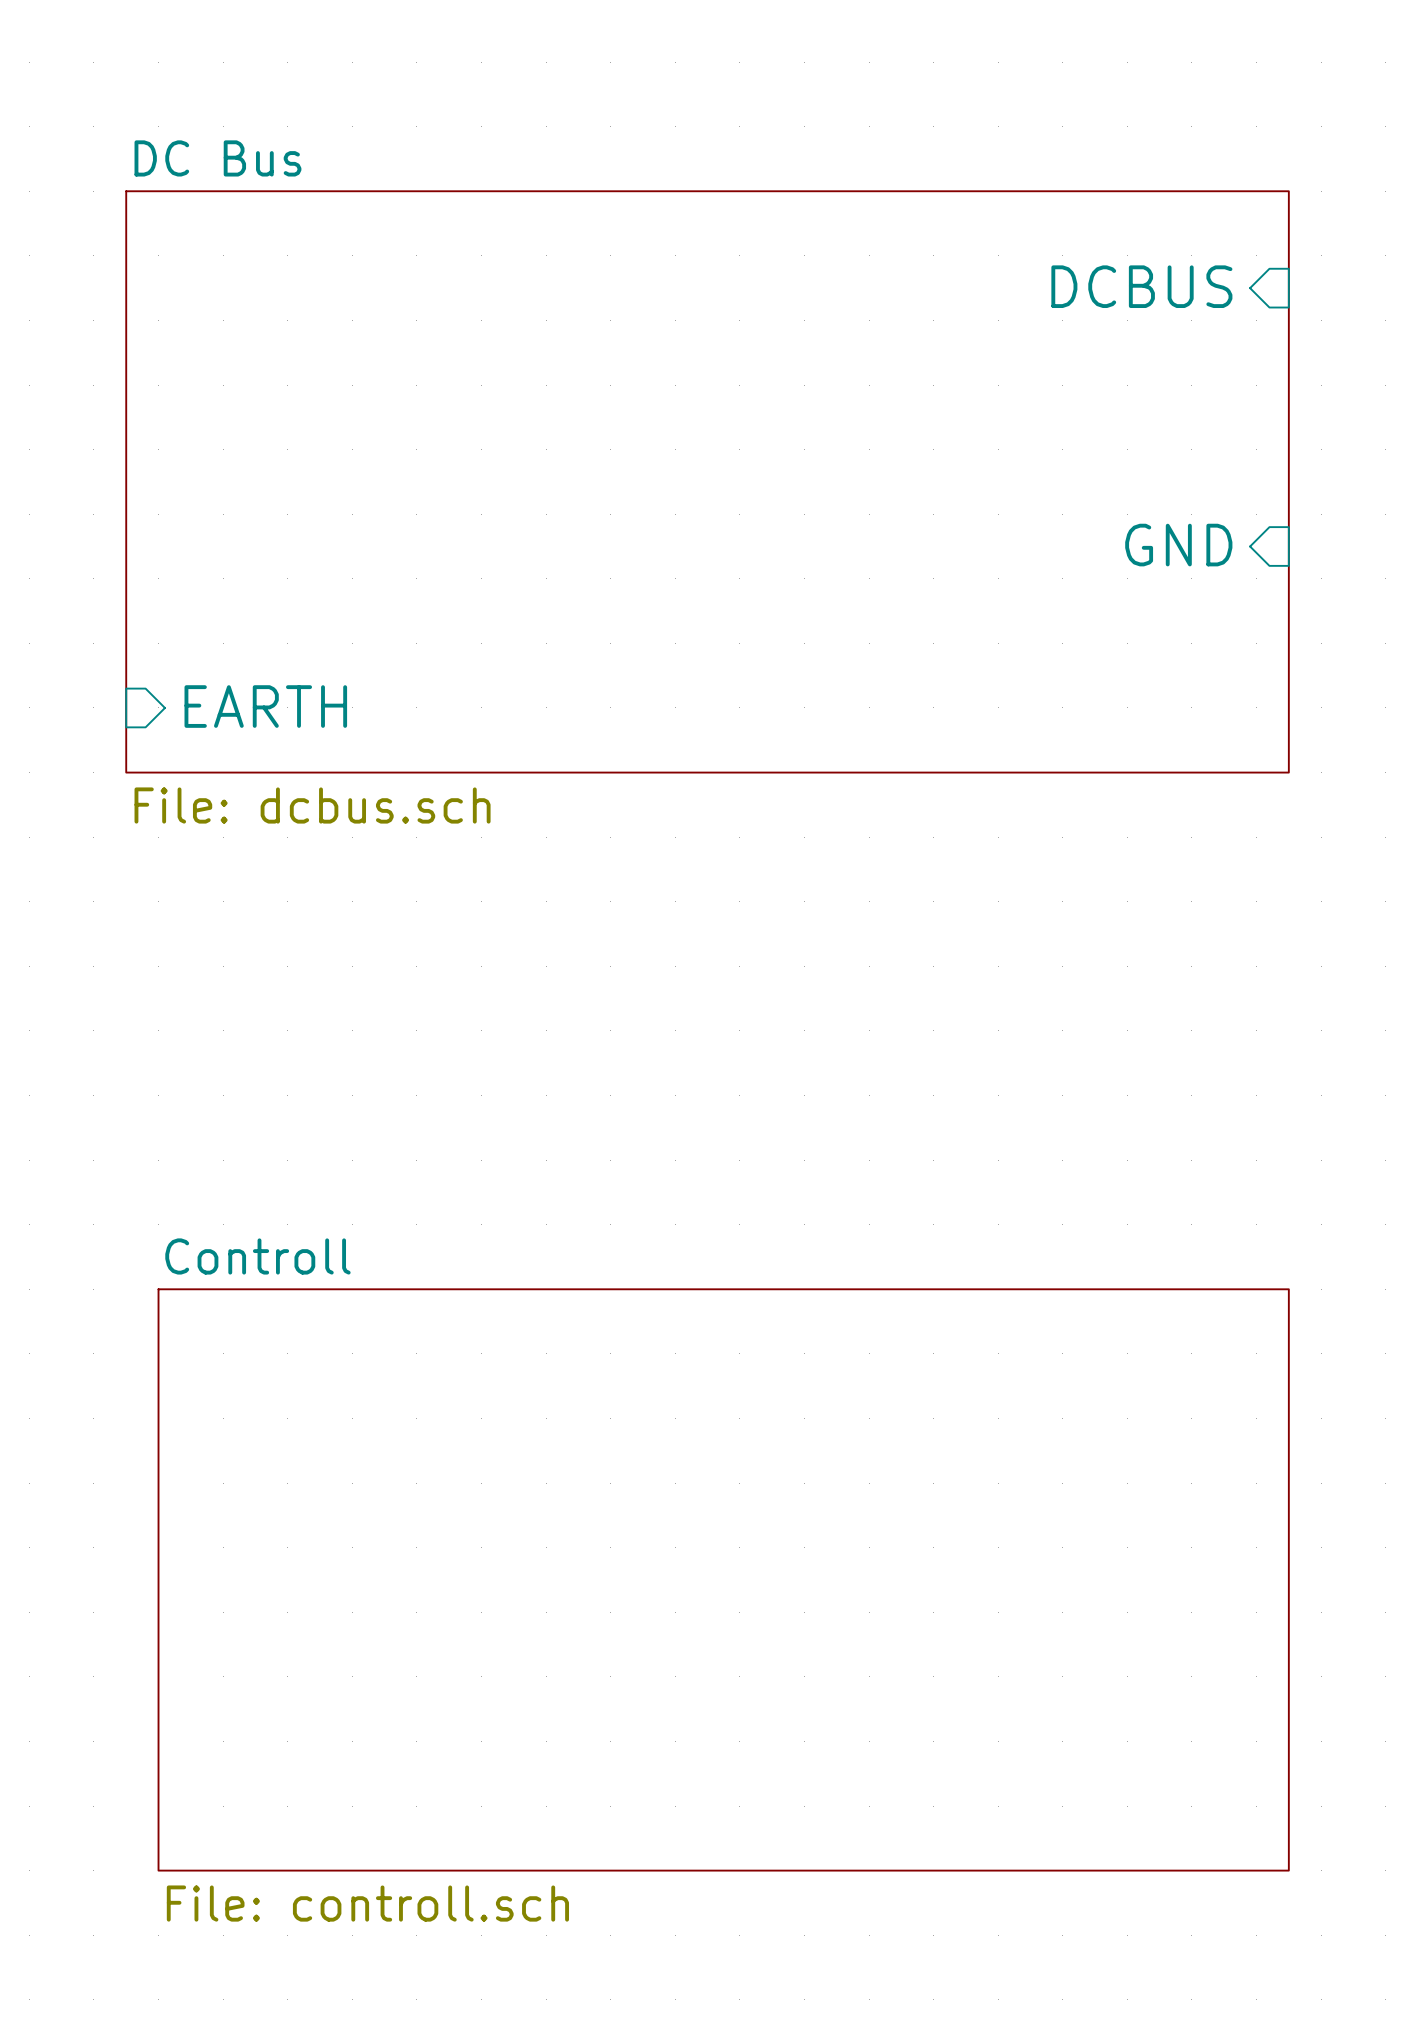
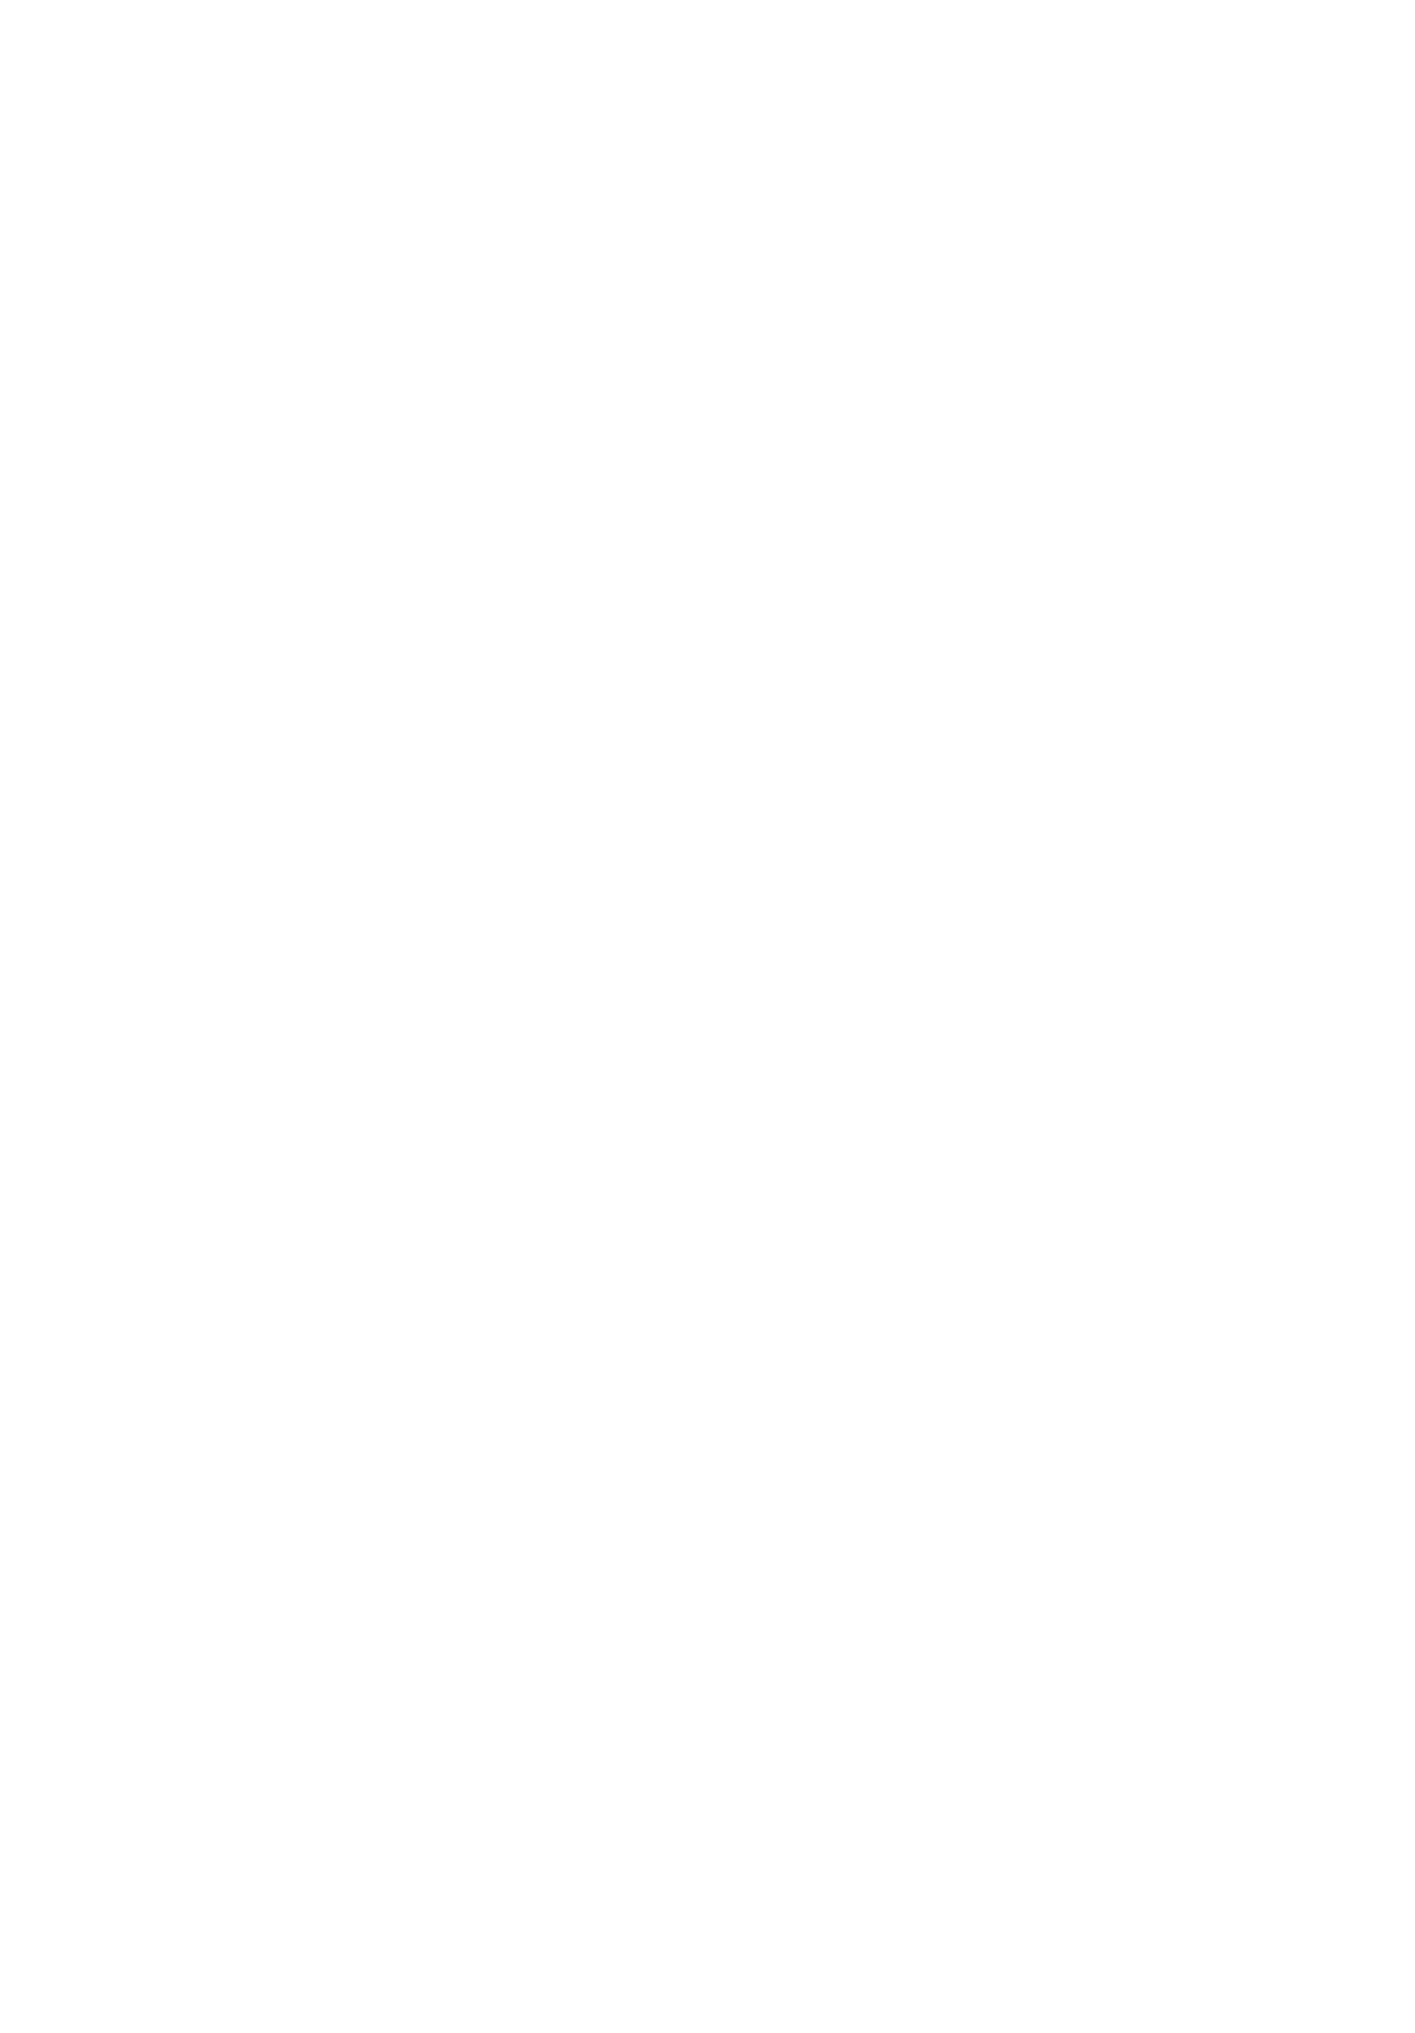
sheet pin: DCBUS (1141, 286) -> none
sheet DC Bus: File: dcbus.sch (707, 481) -> none
sheet pin: GND (1178, 545) -> none
sheet pin: EARTH (265, 706) -> none
sheet Controll: File: controll.sch (723, 1579) -> none

